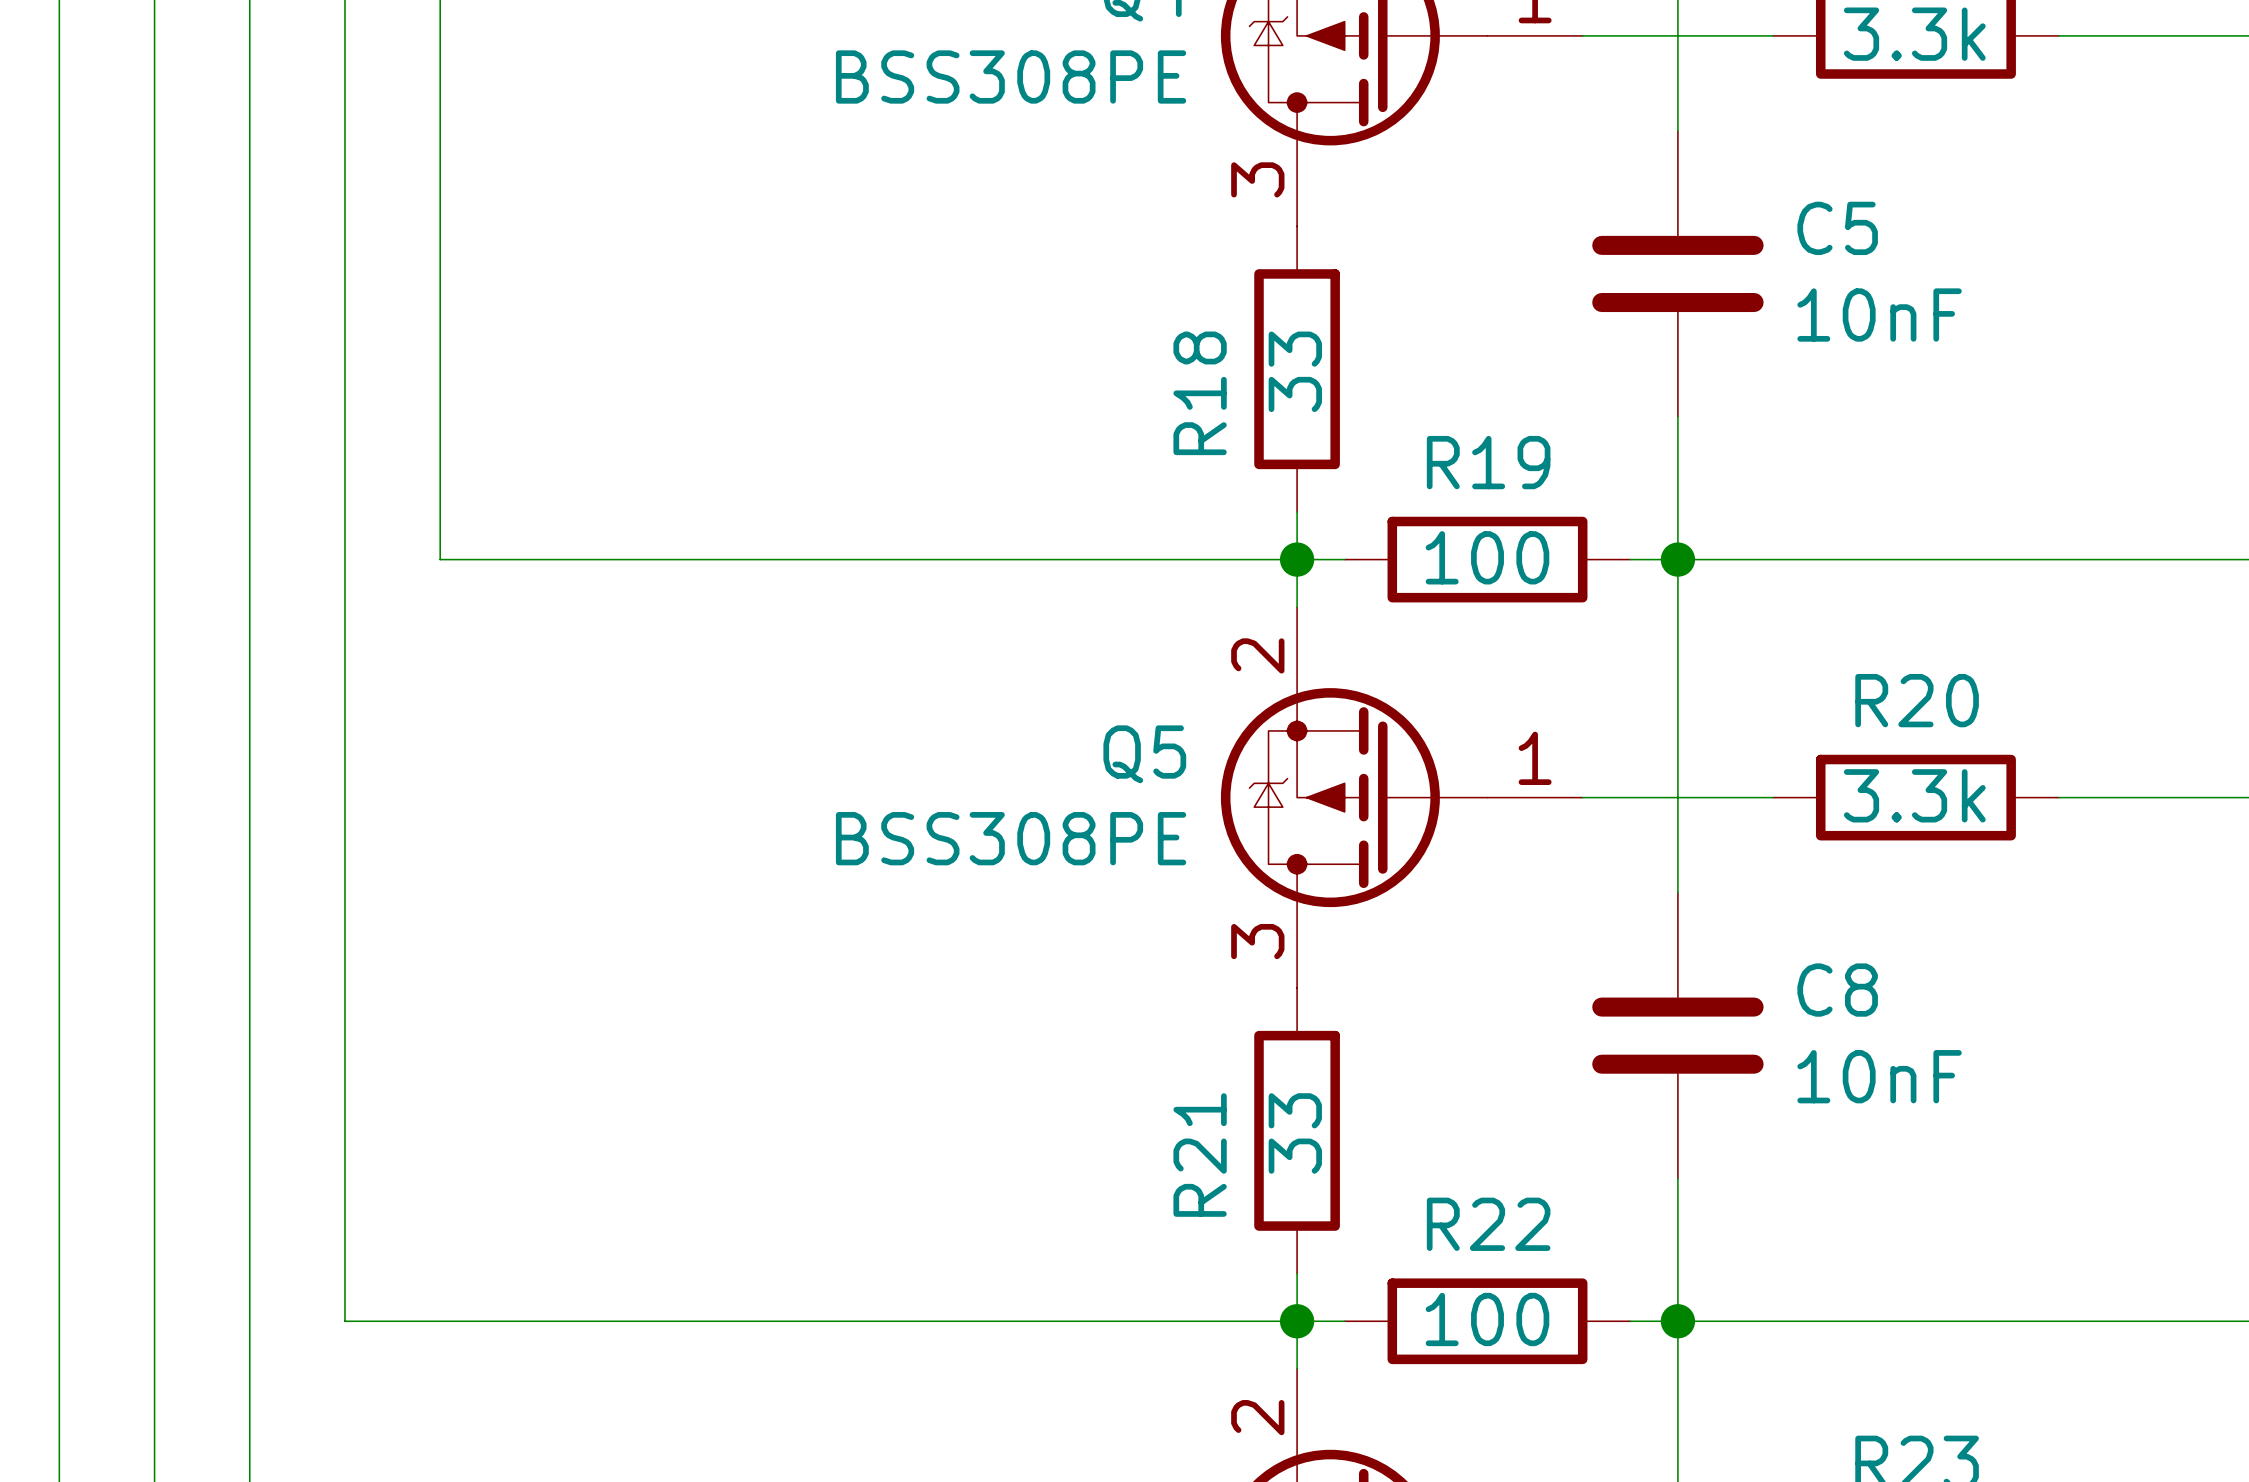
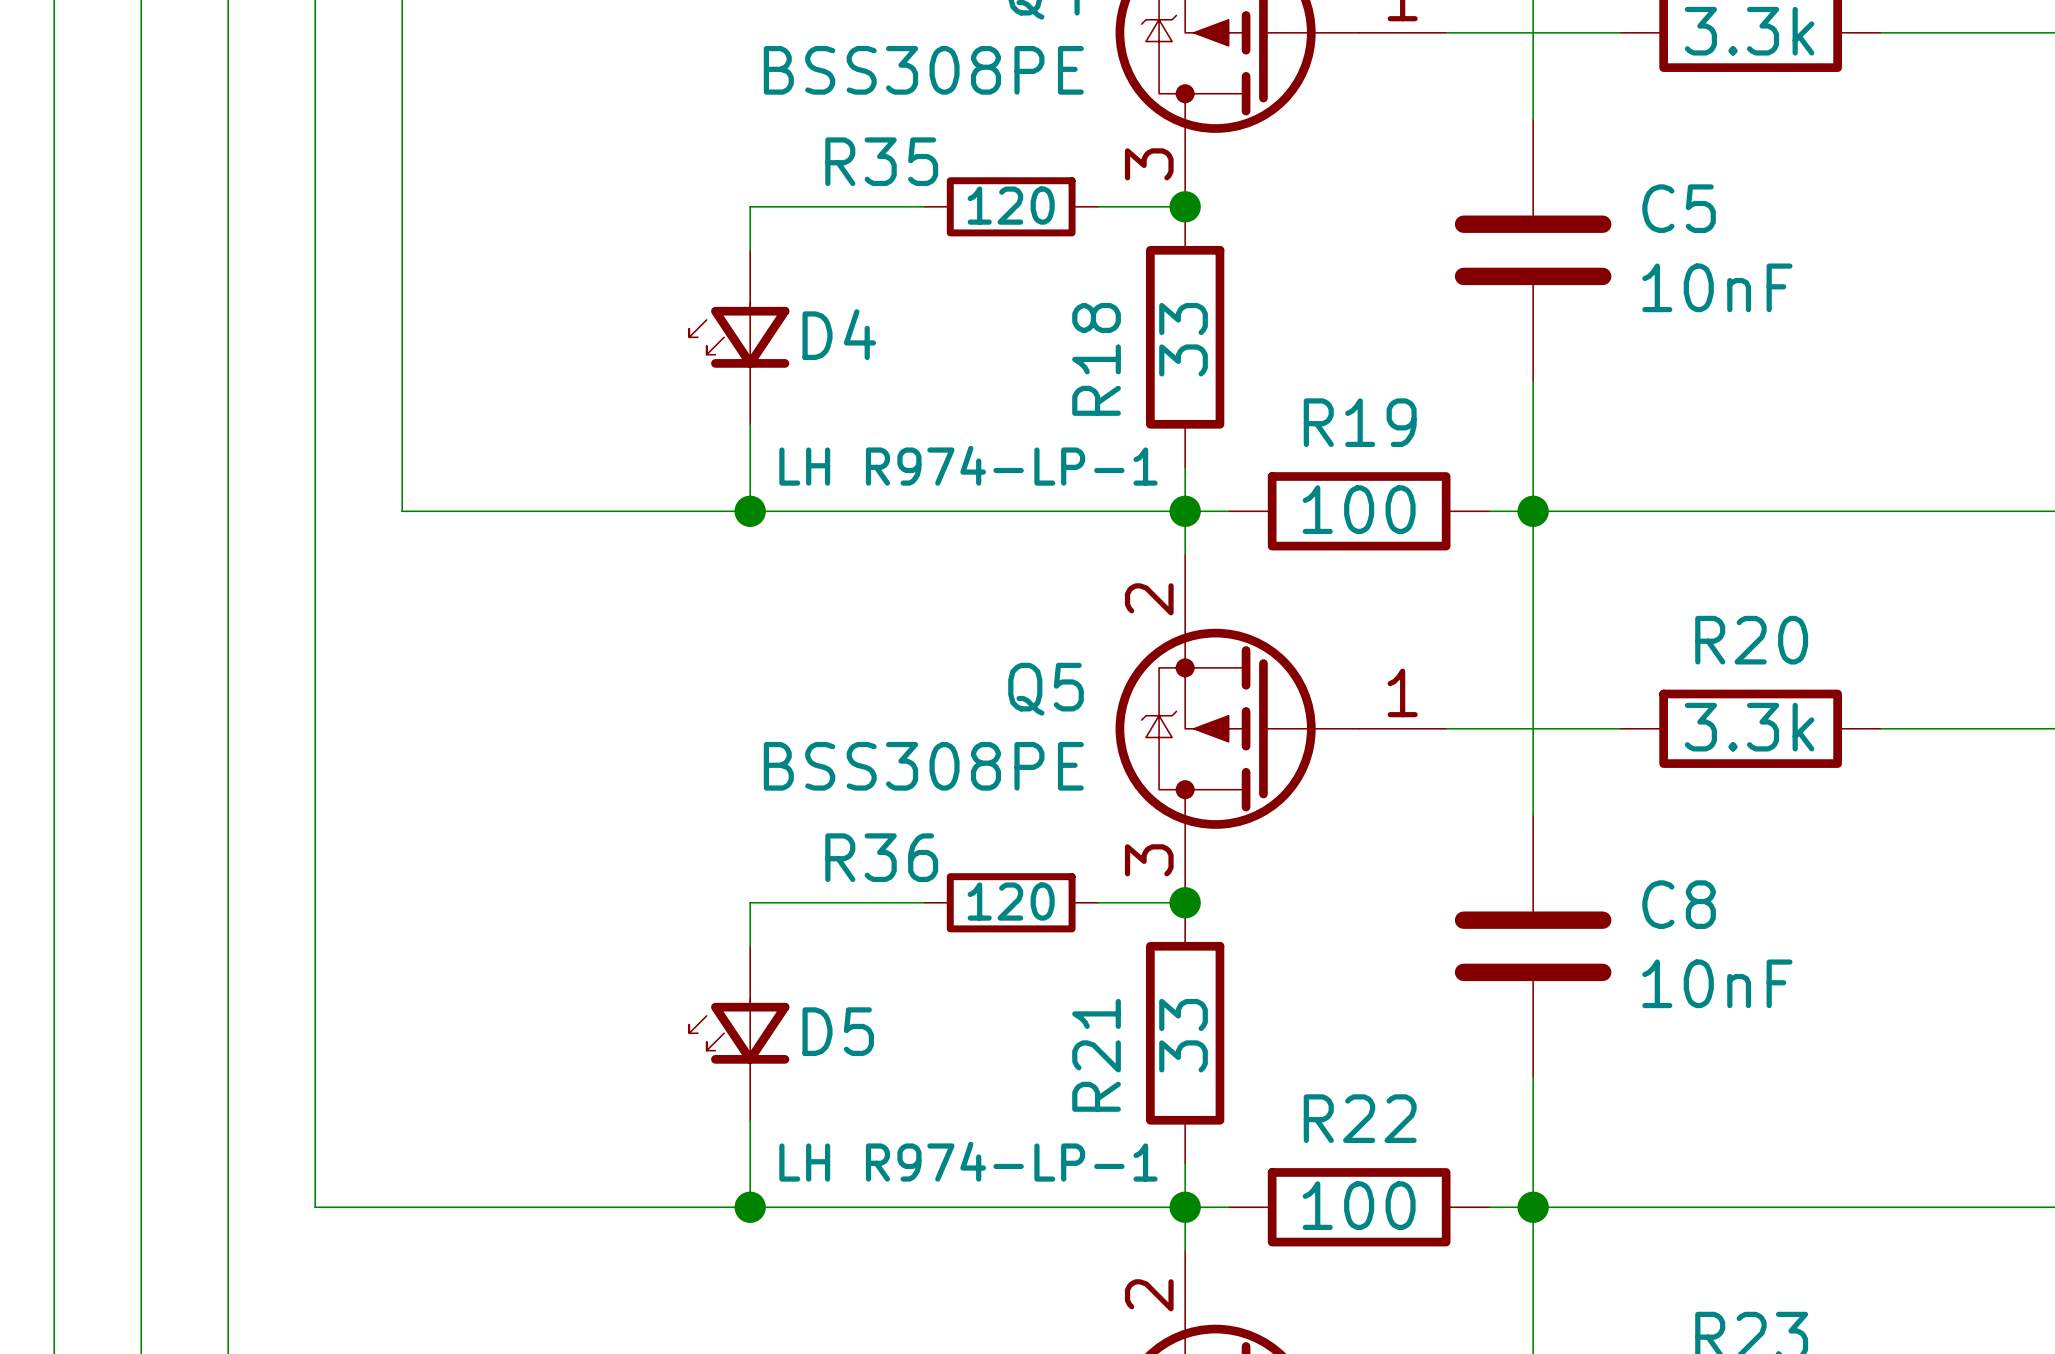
wire: none -> (924, 206) (750, 206) (750, 250)
R35: none -> 120 (1011, 206)
wire: none -> (1098, 206) (1185, 206)
junction: none -> (1185, 206)
D4: none -> LH R974-LP-1 (739, 337)
wire: none -> (750, 424) (750, 511)
junction: none -> (750, 511)
wire: none -> (924, 902) (750, 902) (750, 946)
R36: none -> 120 (1011, 902)
wire: none -> (1098, 902) (1185, 902)
junction: none -> (1185, 902)
D5: none -> LH R974-LP-1 (739, 1033)
wire: none -> (750, 1120) (750, 1207)
junction: none -> (750, 1207)

